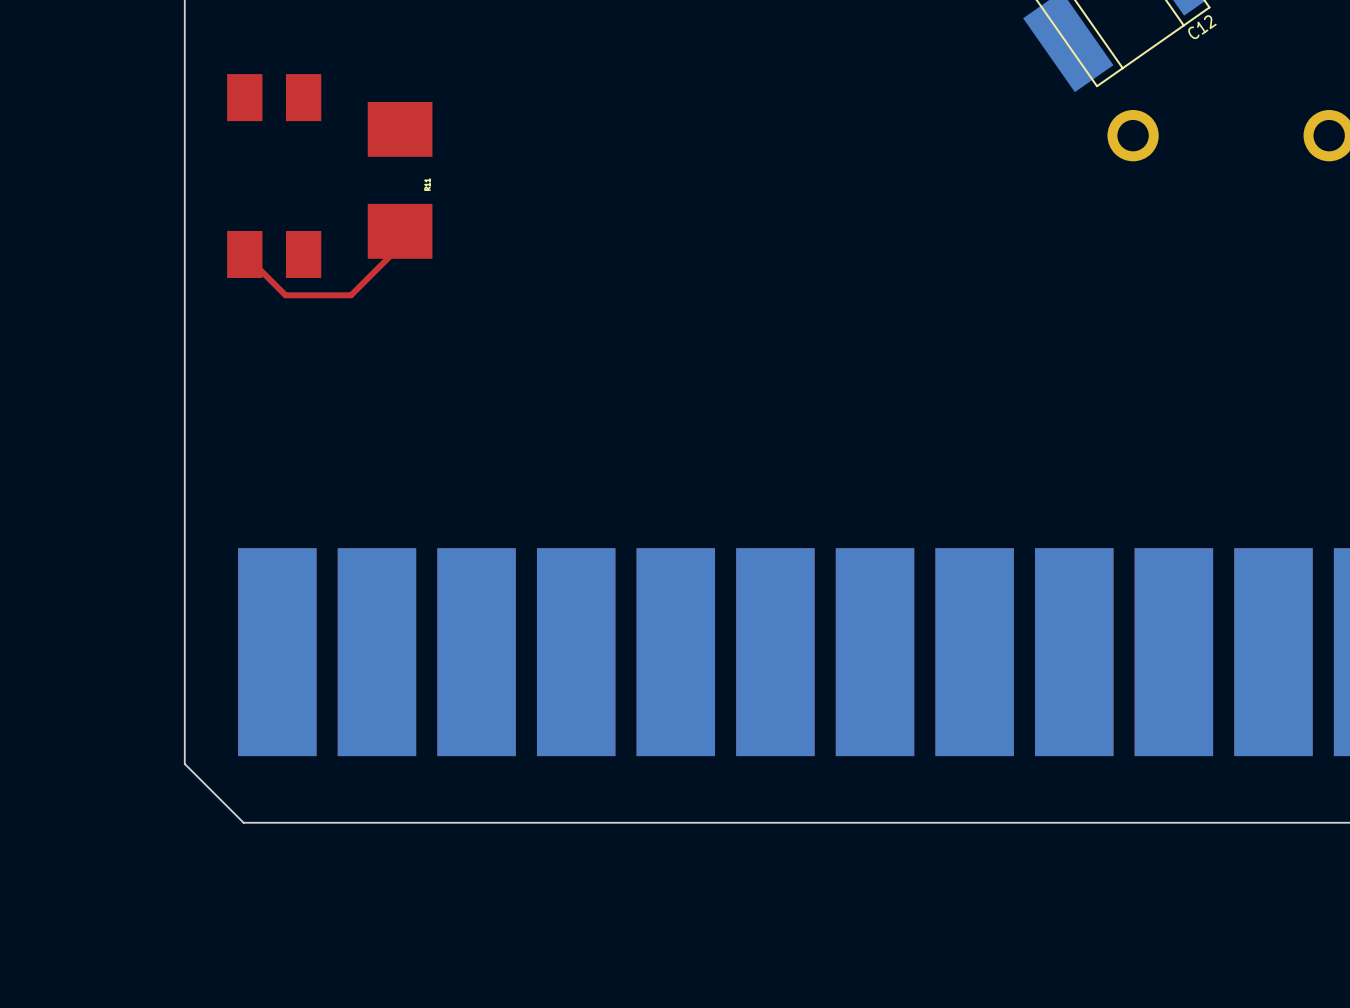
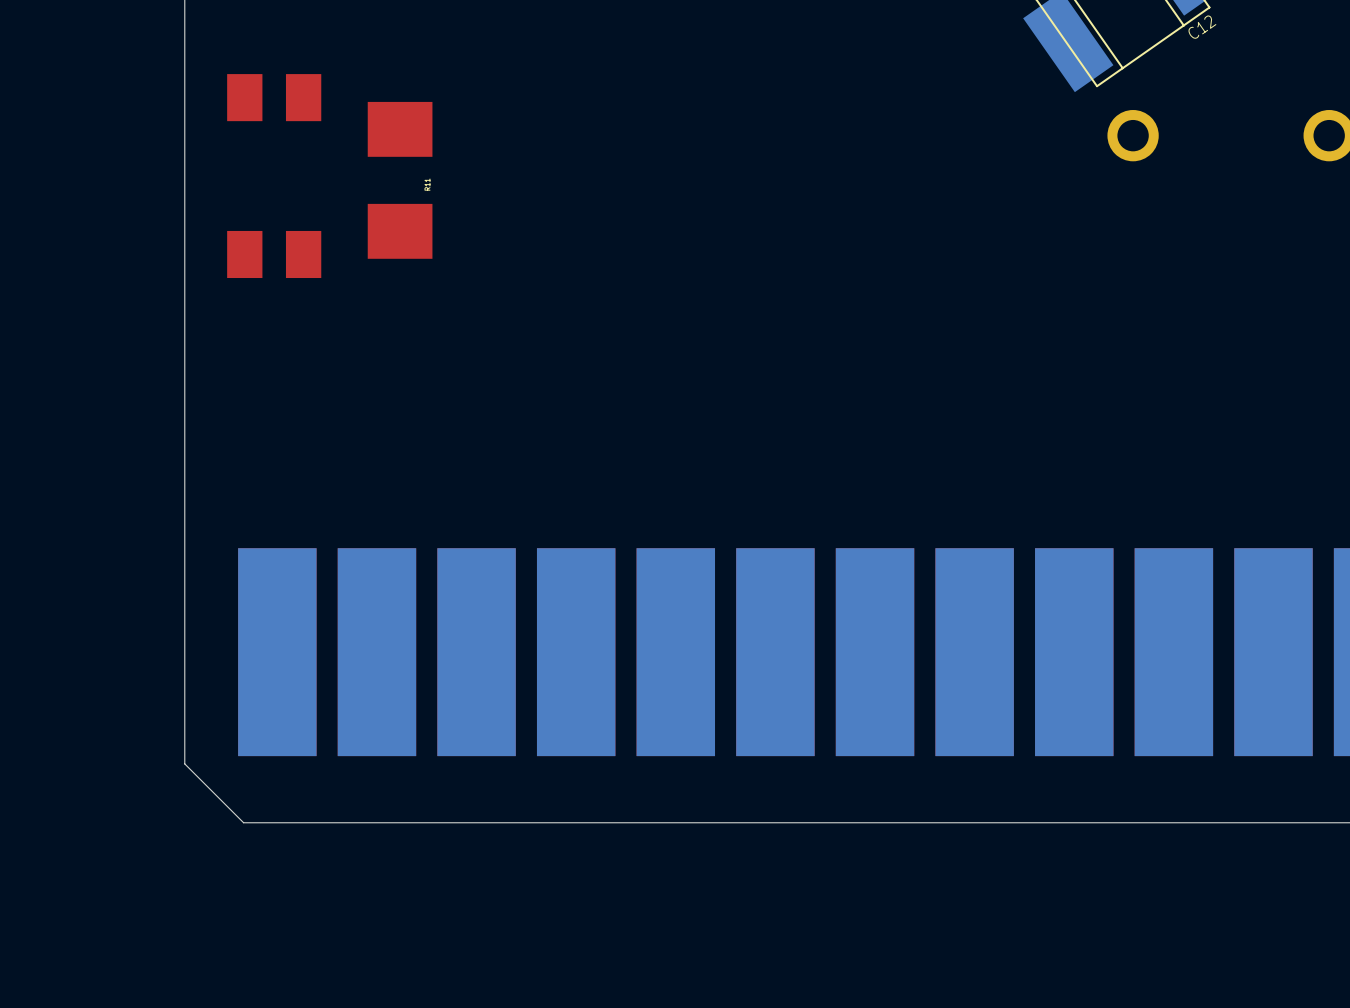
top track: (400, 231) (400, 246) (351, 295) (285, 295) (244, 254) -> none

